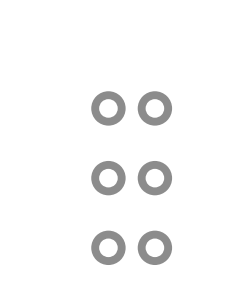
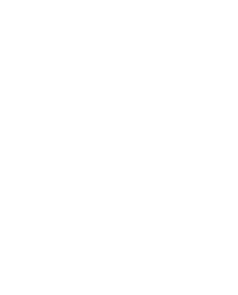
part: (131, 108) -> none
part: (131, 178) -> none
part: (131, 247) -> none

